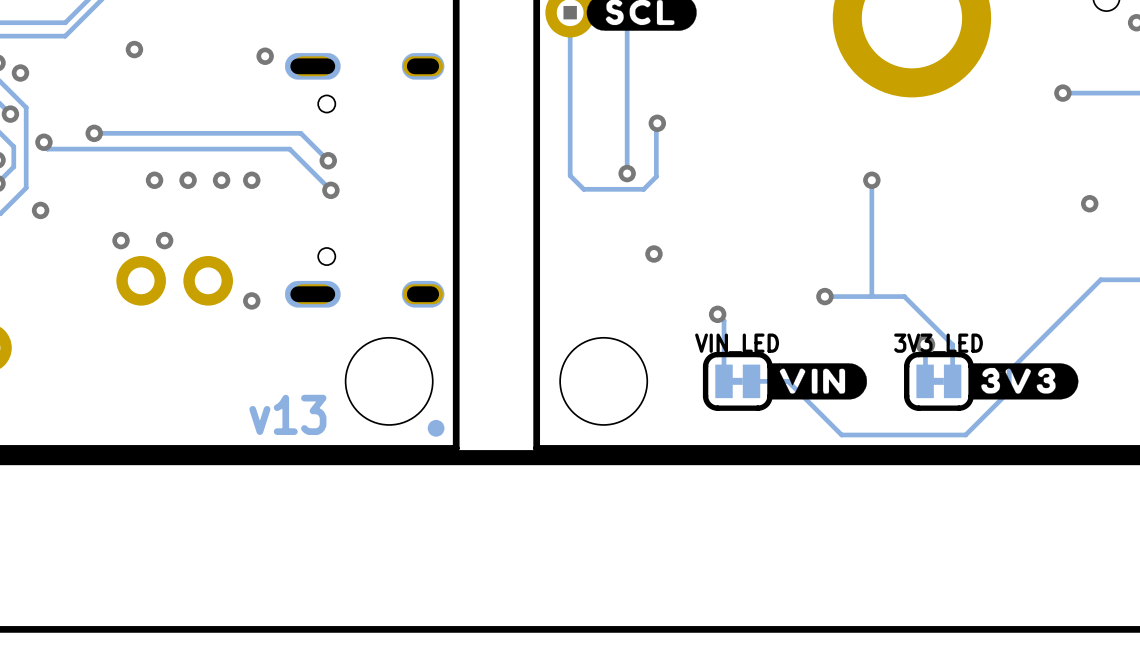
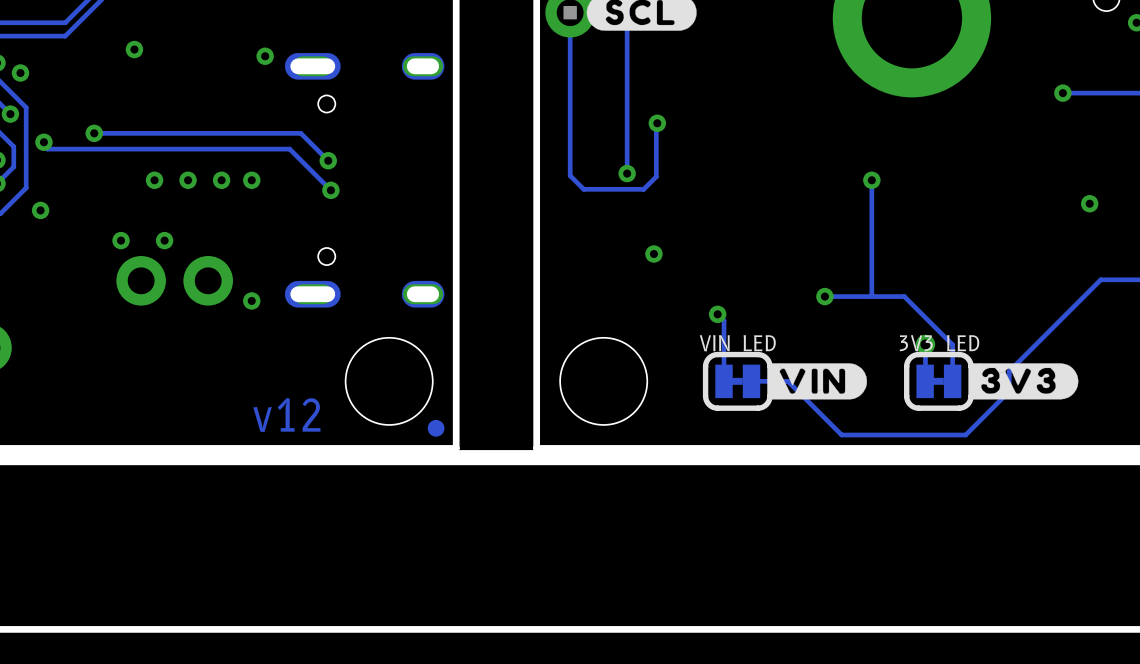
text: v13 (287, 414) -> v12 (286, 415)

